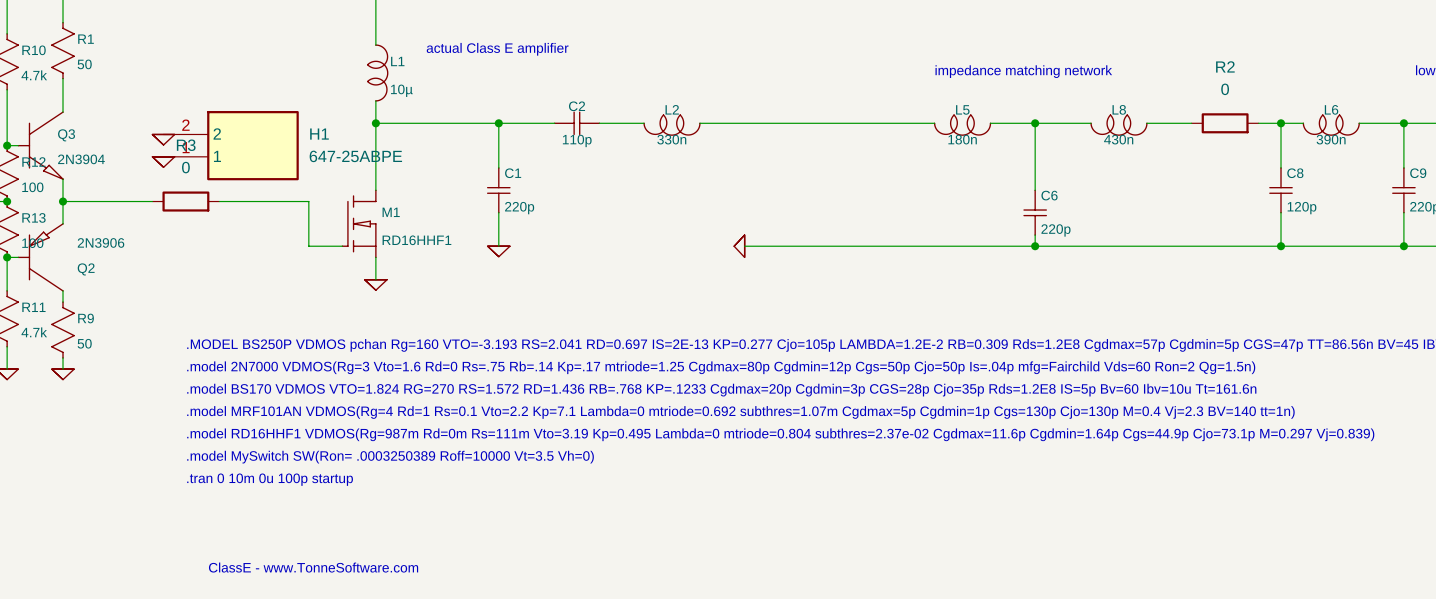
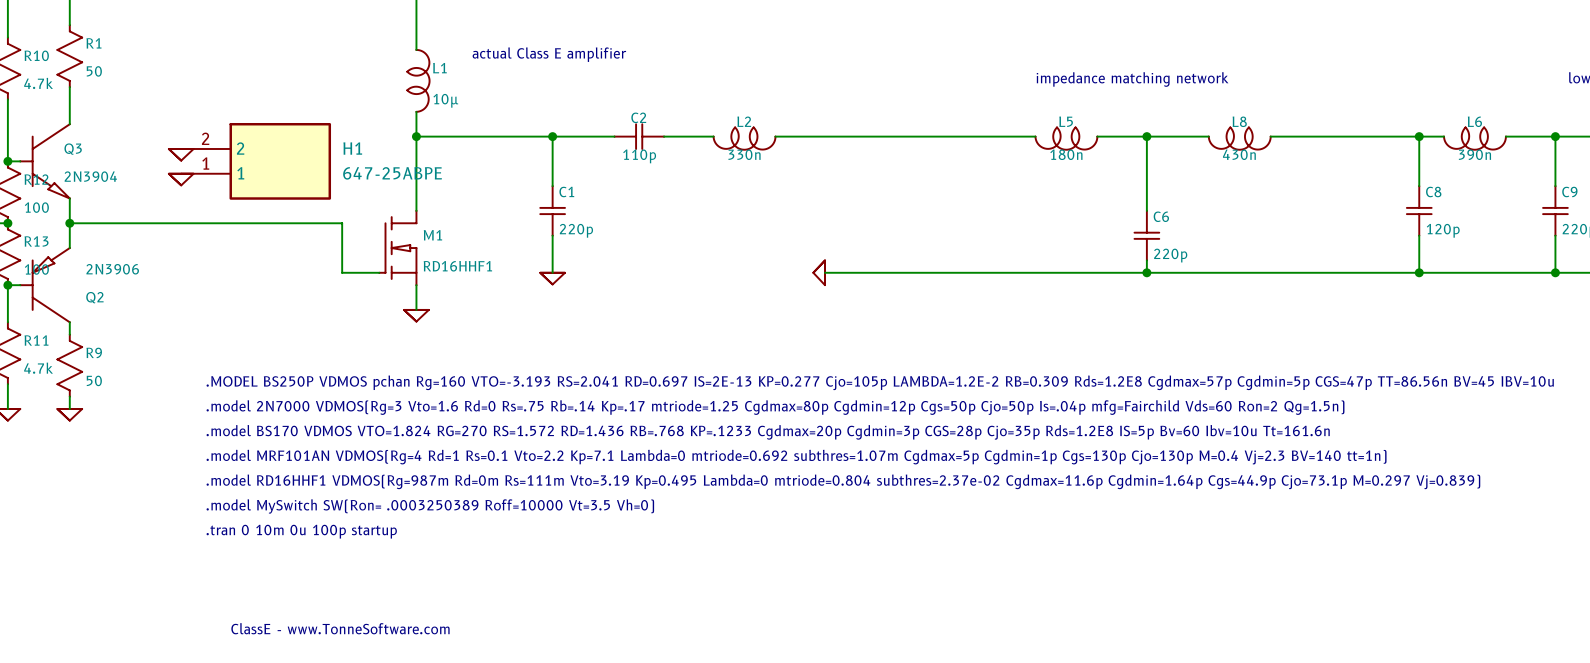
wire: none -> (1320, 136) (1394, 136)
R2: 0 (1225, 123) -> none
wire: none -> (168, 223) (243, 223)
R3: 0 (185, 201) -> none

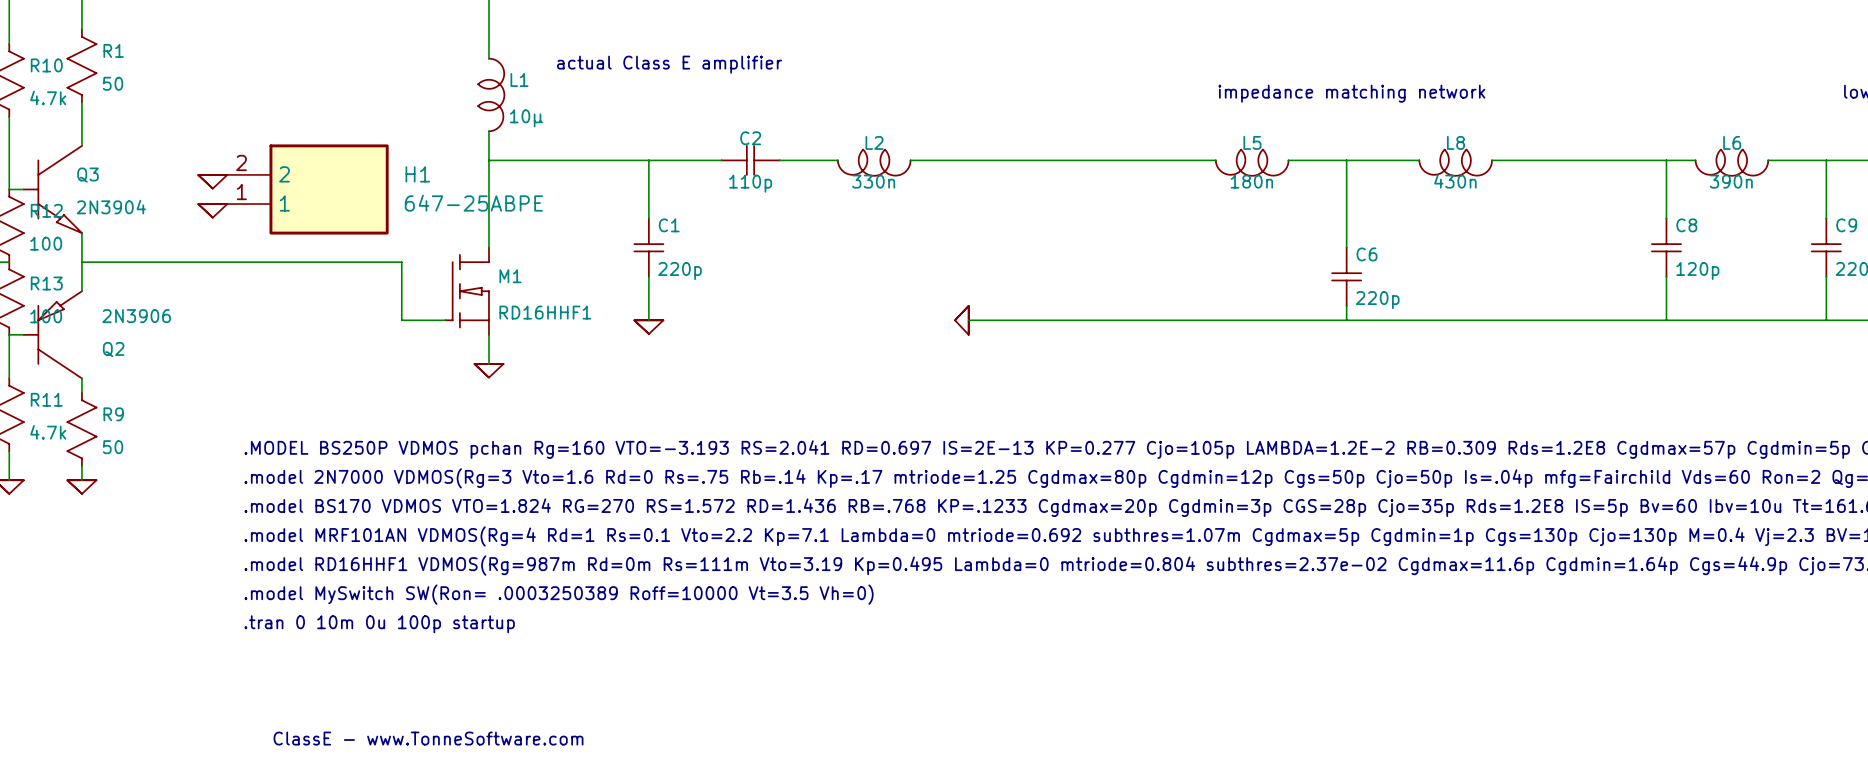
junction: (416, 136) -> none
junction: (552, 136) -> none
junction: (1146, 136) -> none
junction: (1419, 136) -> none
junction: (1555, 136) -> none
junction: (7, 161) -> none
junction: (7, 223) -> none
junction: (69, 223) -> none
junction: (1146, 272) -> none
junction: (1419, 272) -> none
junction: (1555, 272) -> none
junction: (7, 285) -> none

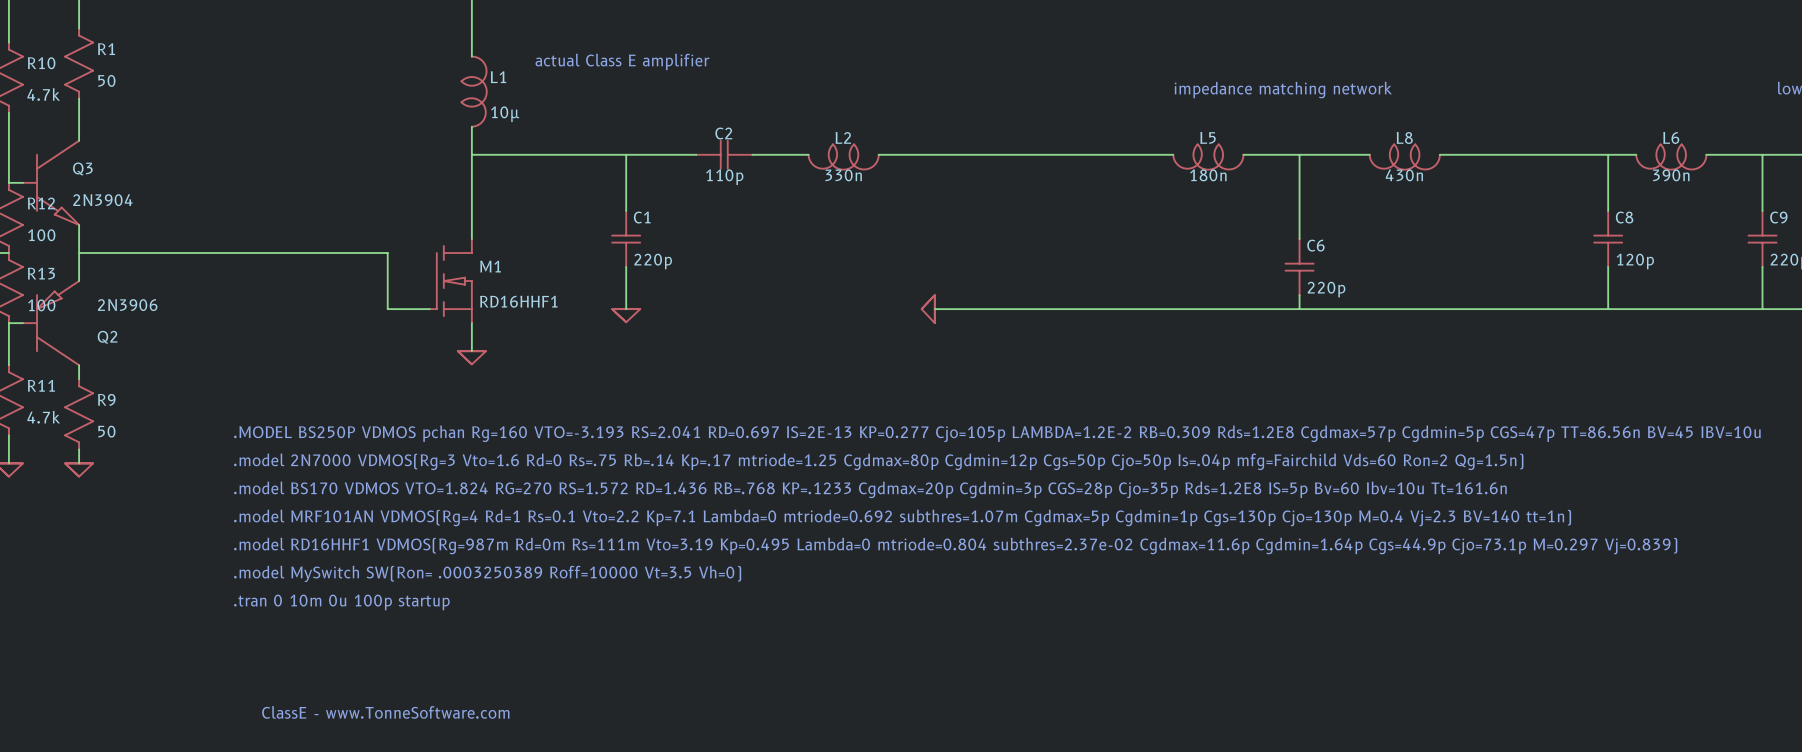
power symbol: (212, 181) -> none
H1: 647-25ABPE (300, 189) -> none
power symbol: (212, 210) -> none

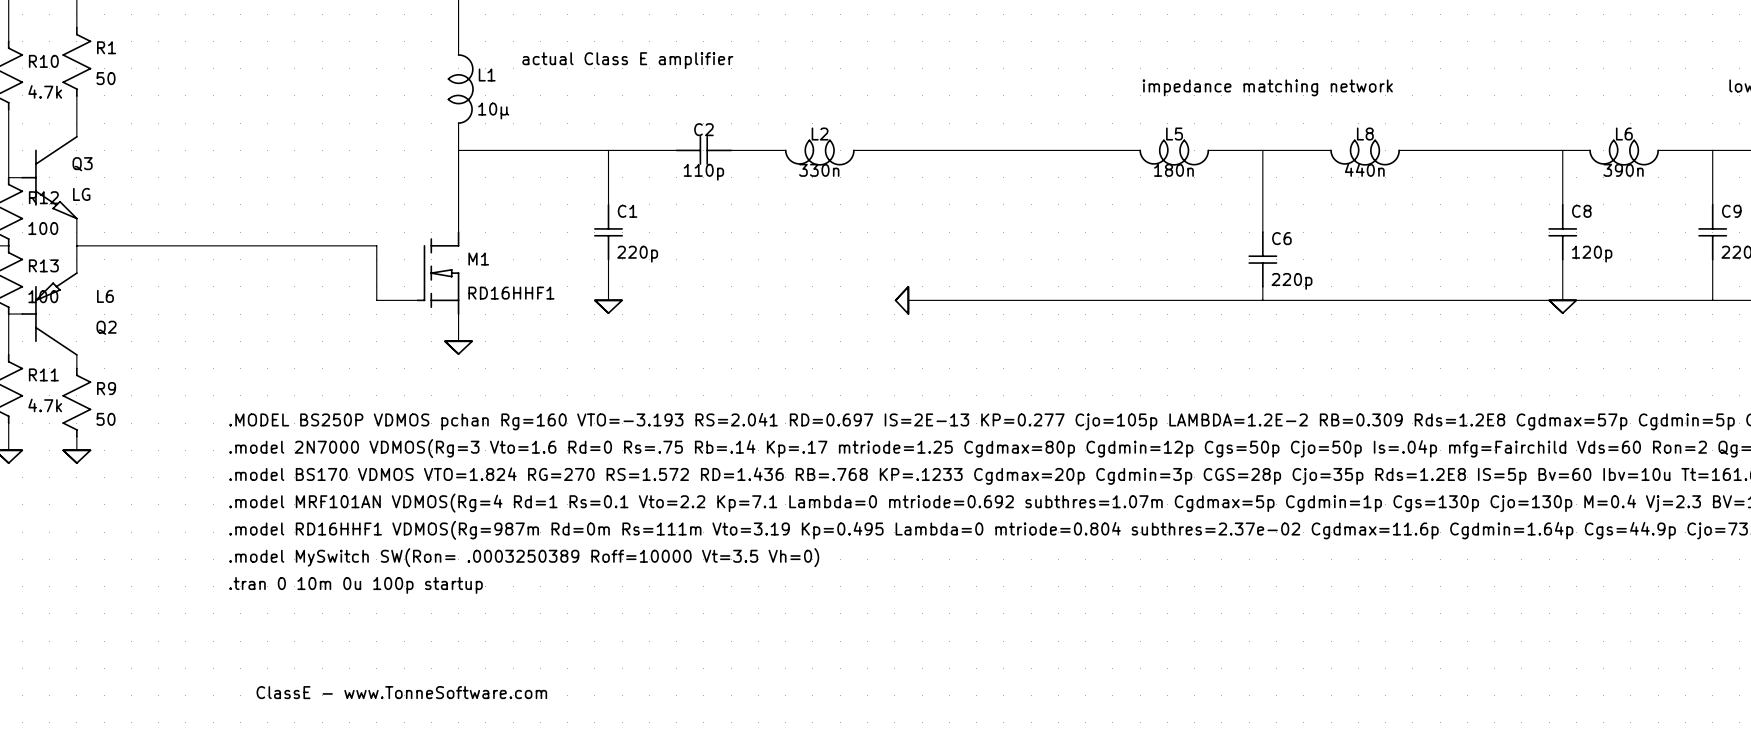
L8 value: 430n (1404, 175) -> 440n (1364, 170)
Q3 value: 2N3904 (102, 200) -> LG (81, 194)
Q2 value: 2N3906 (127, 305) -> L6 (105, 296)
power symbol: none -> (1562, 306)

